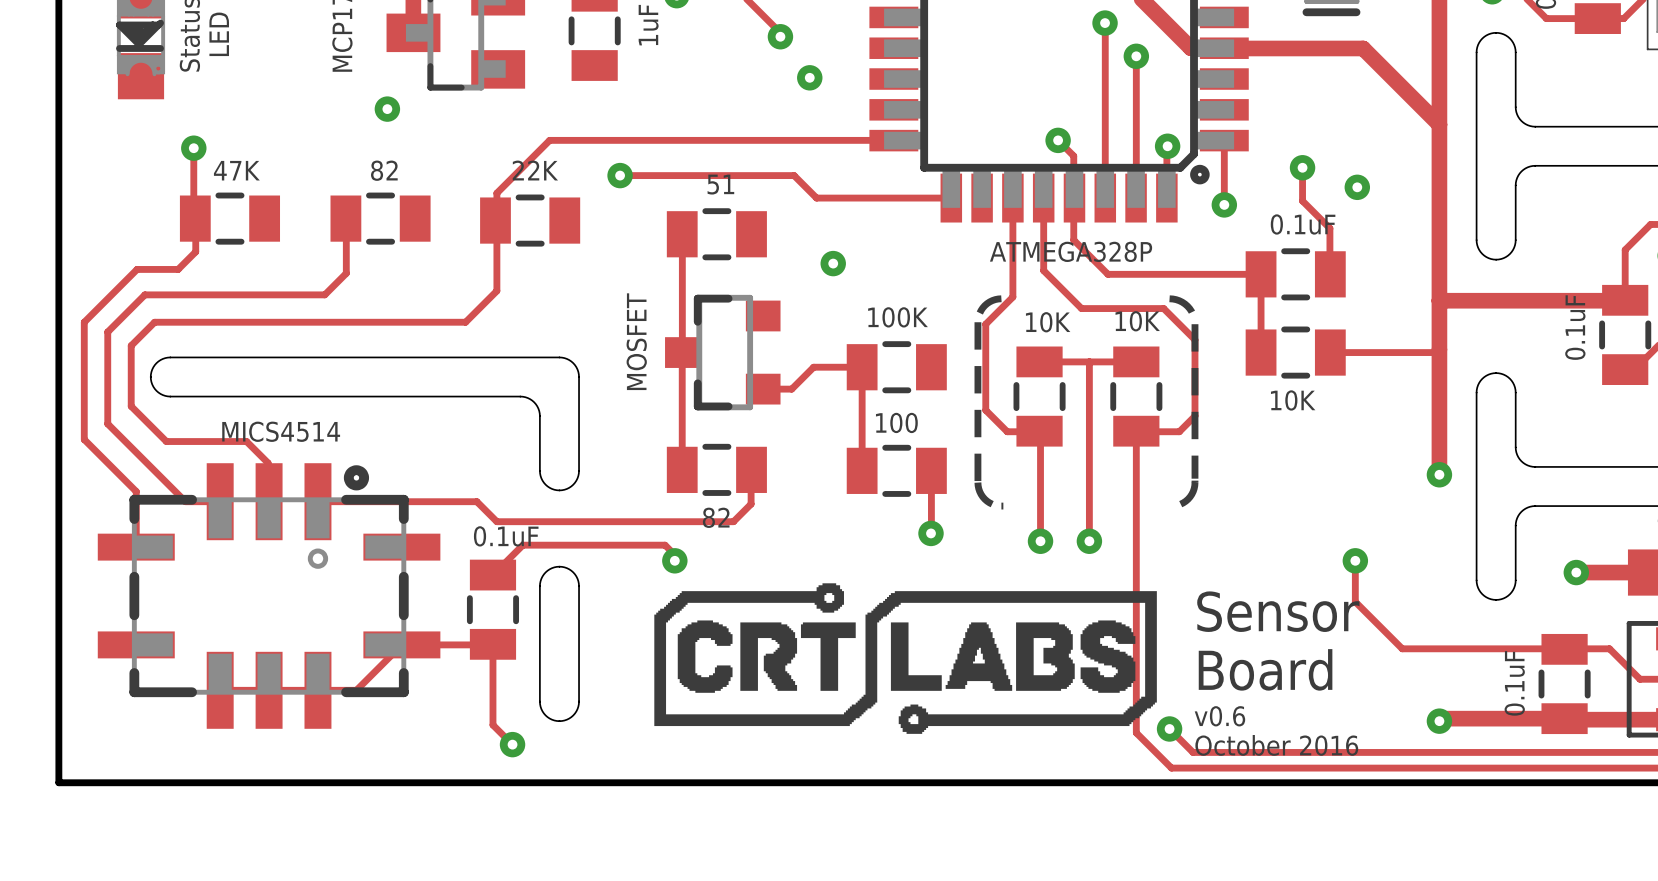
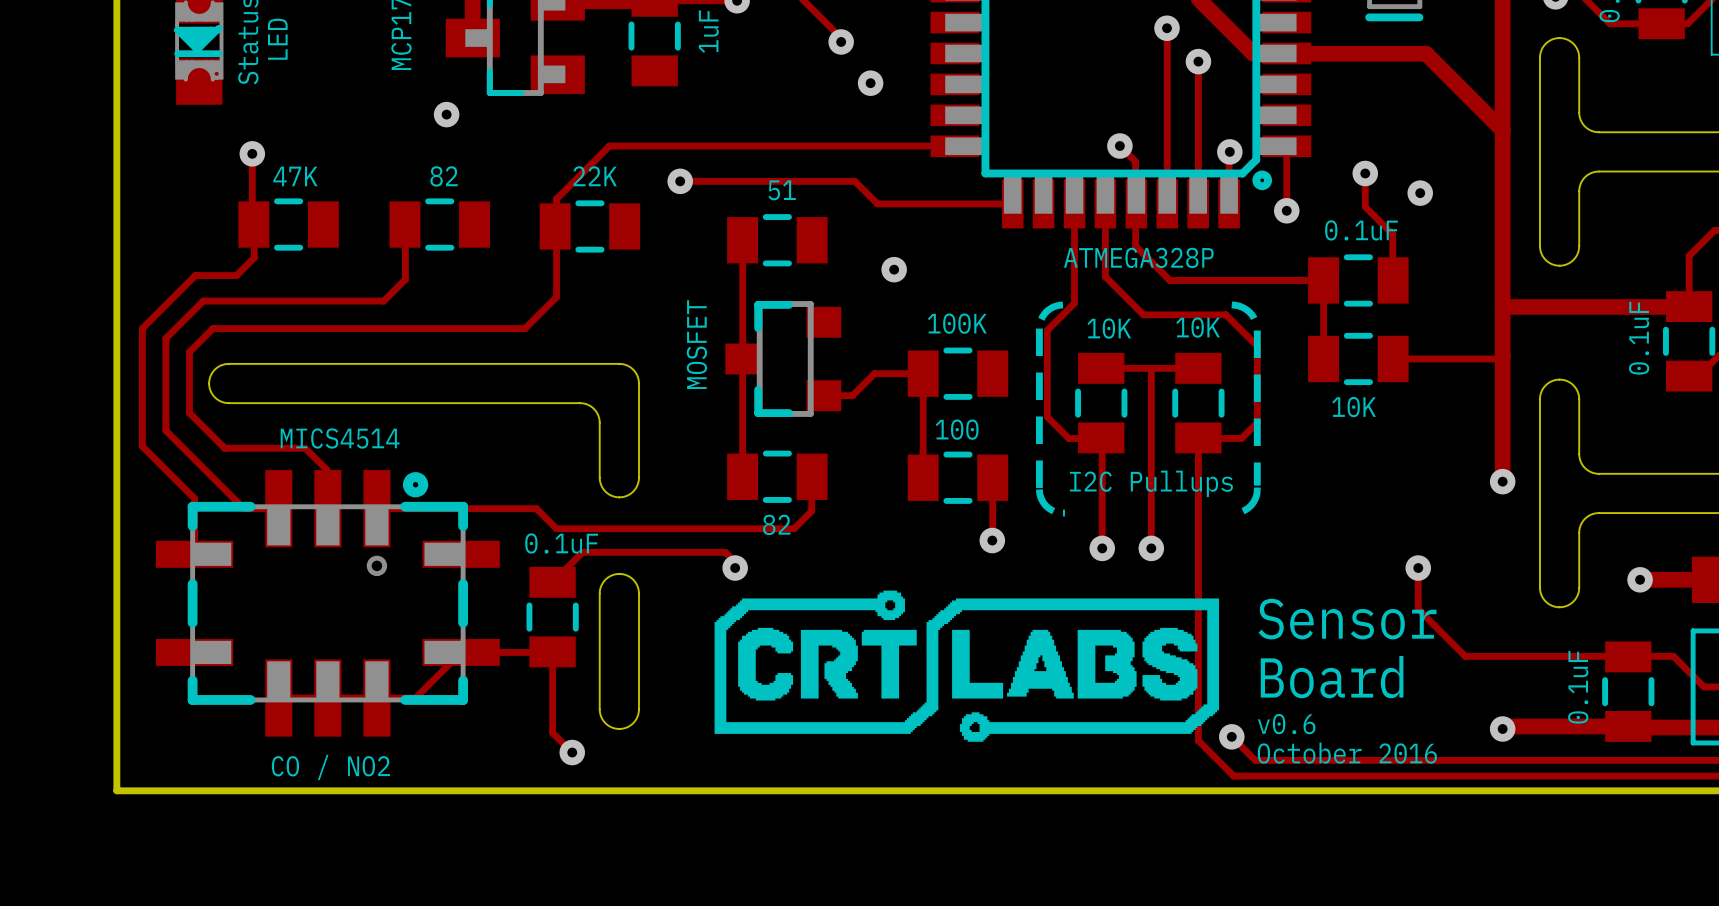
text: none -> I2C Pullups (1151, 483)
text: none -> CO / NO2 (330, 767)

